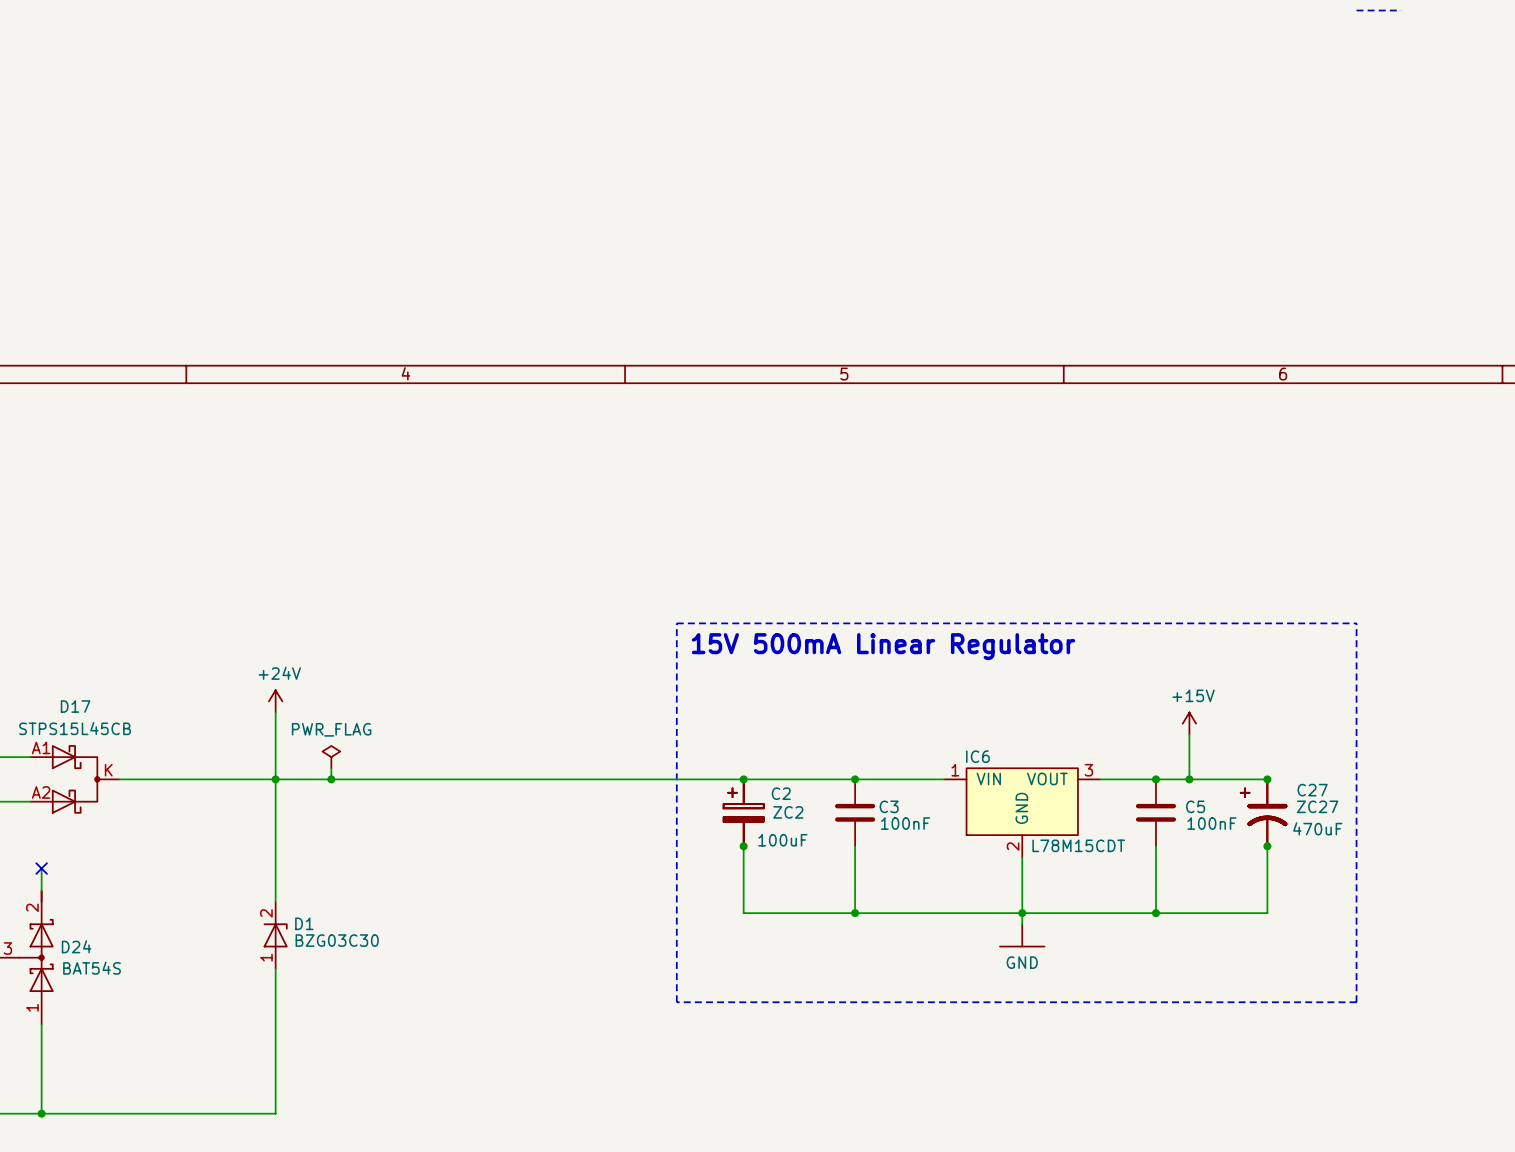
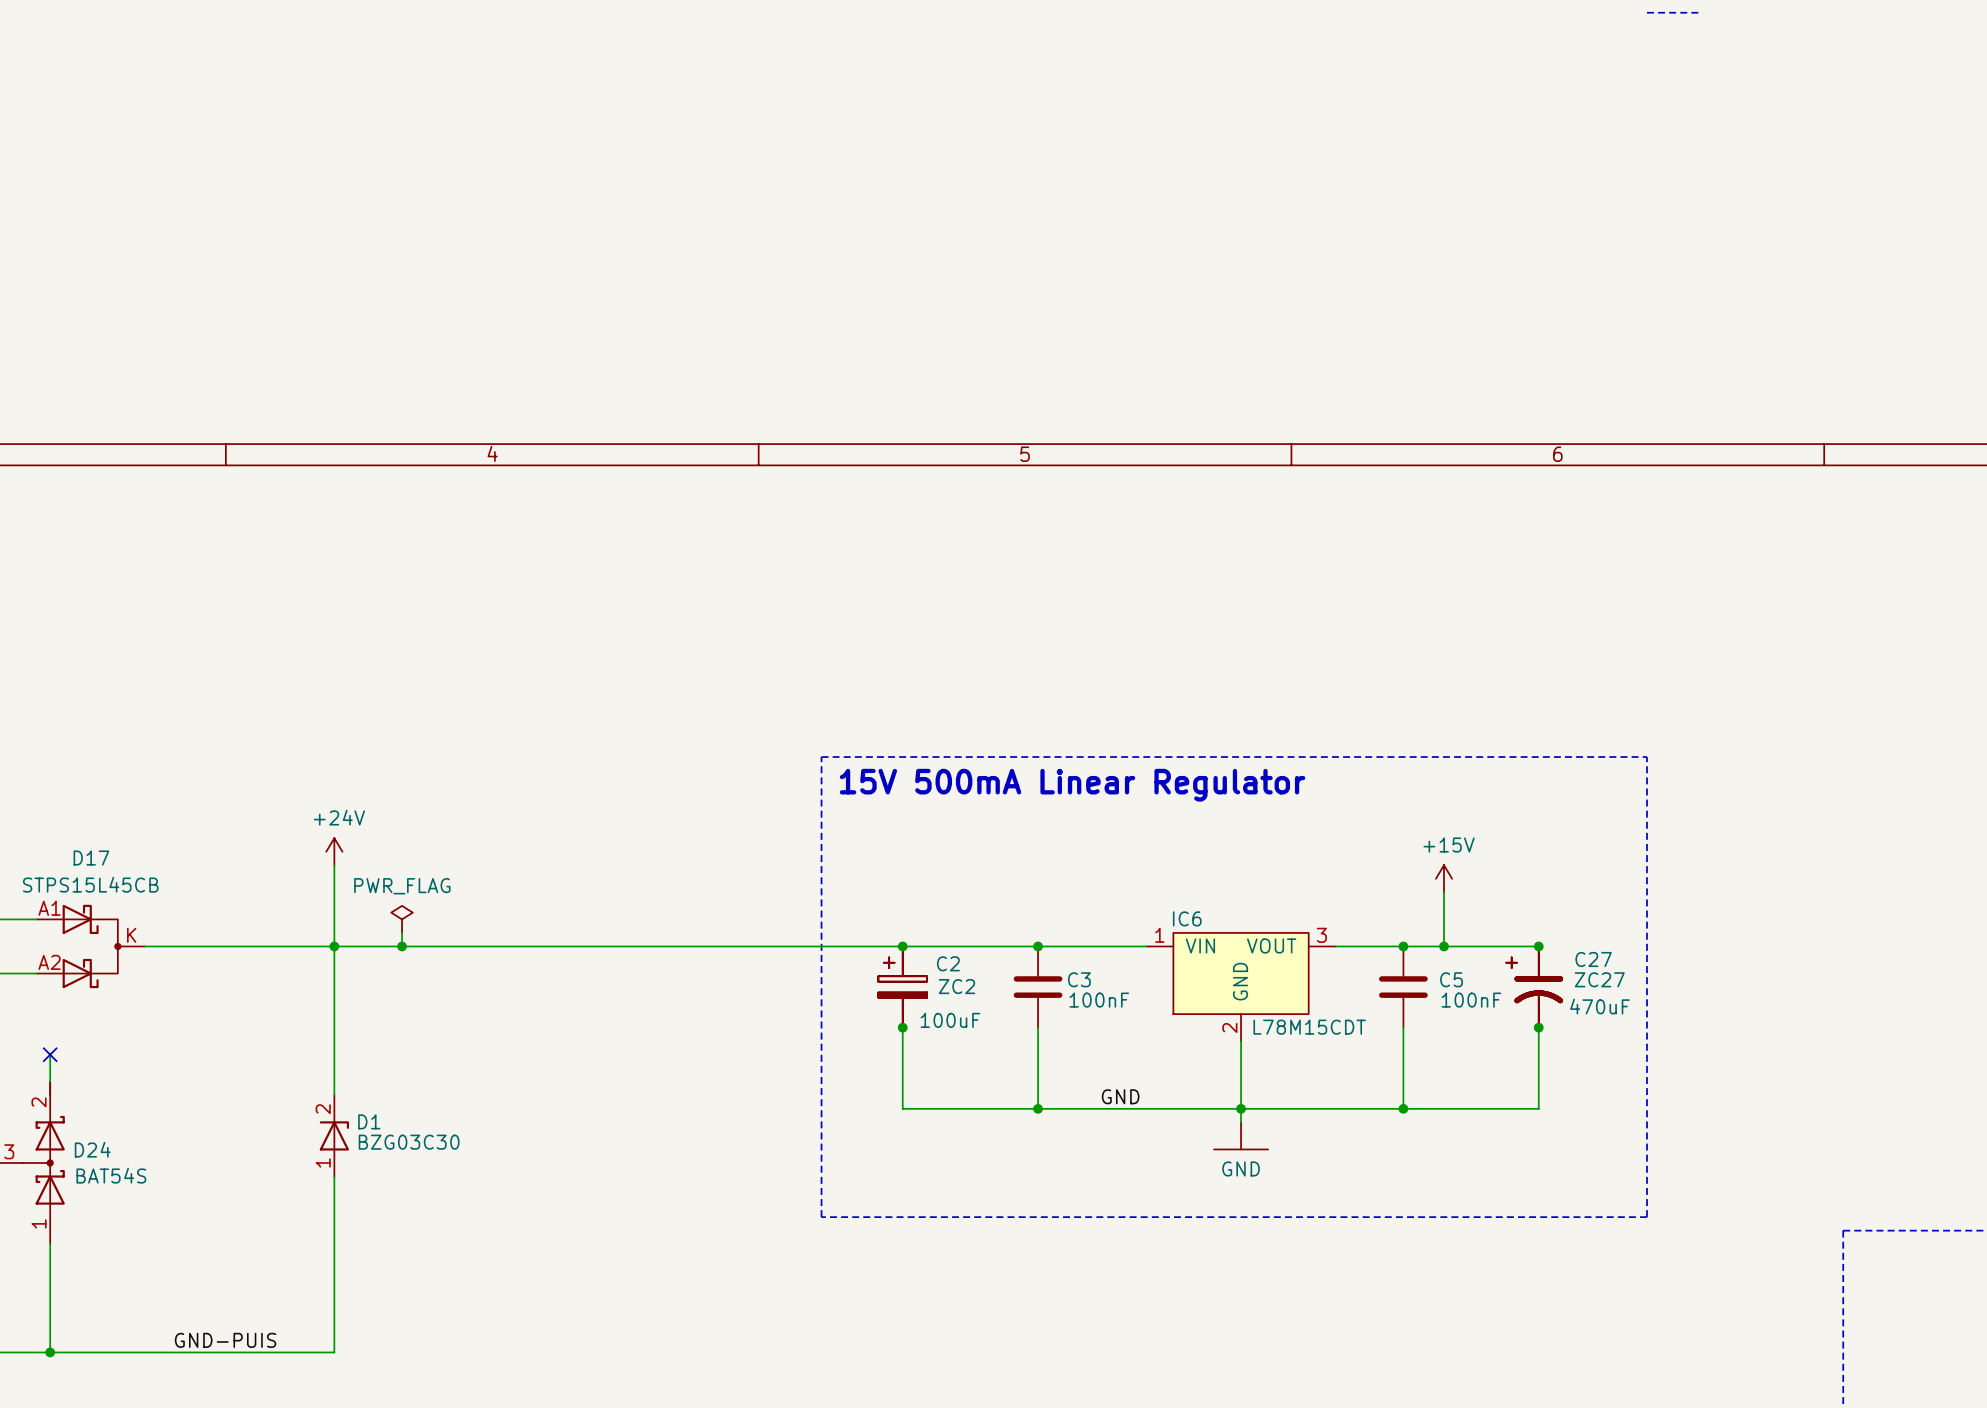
label: none -> GND (1120, 1096)
label: none -> GND-PUIS (225, 1340)

